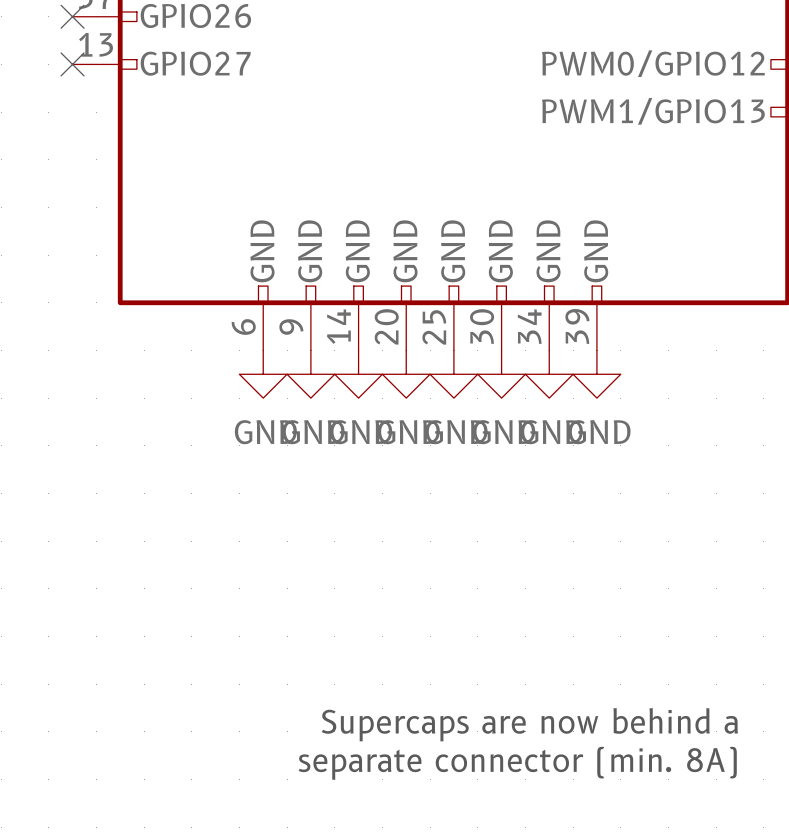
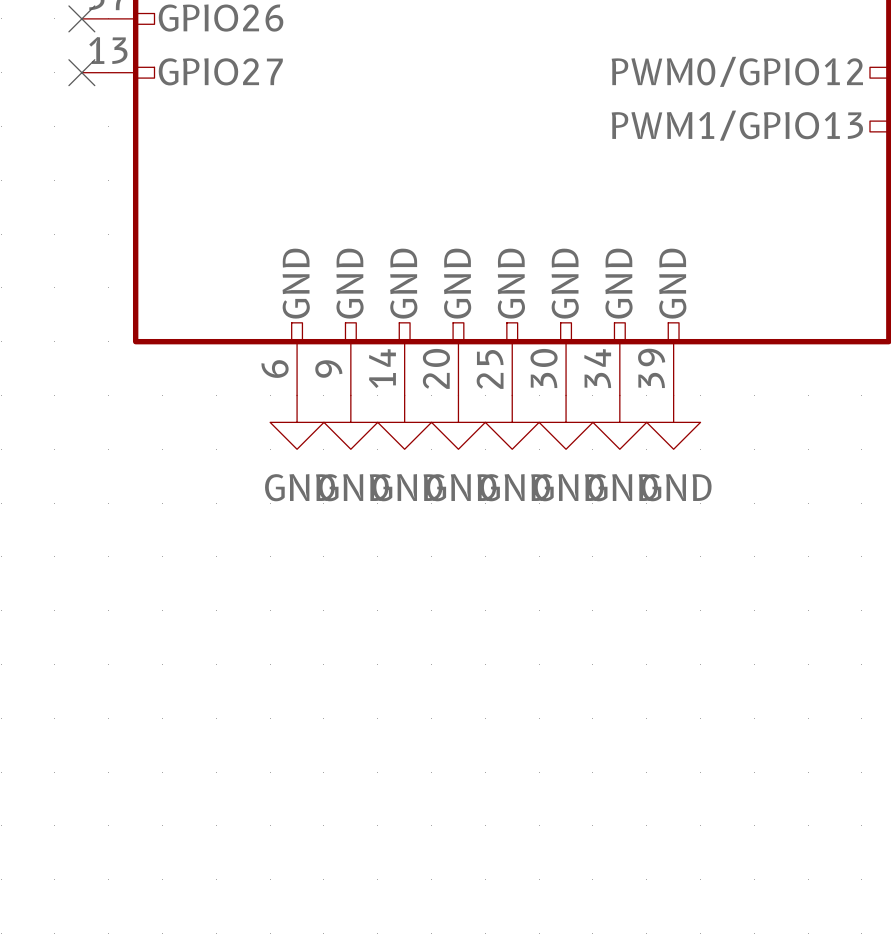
text: Supercaps are now behind a (529, 724) -> none
text: separate connector (min. 8A) (517, 763) -> none

